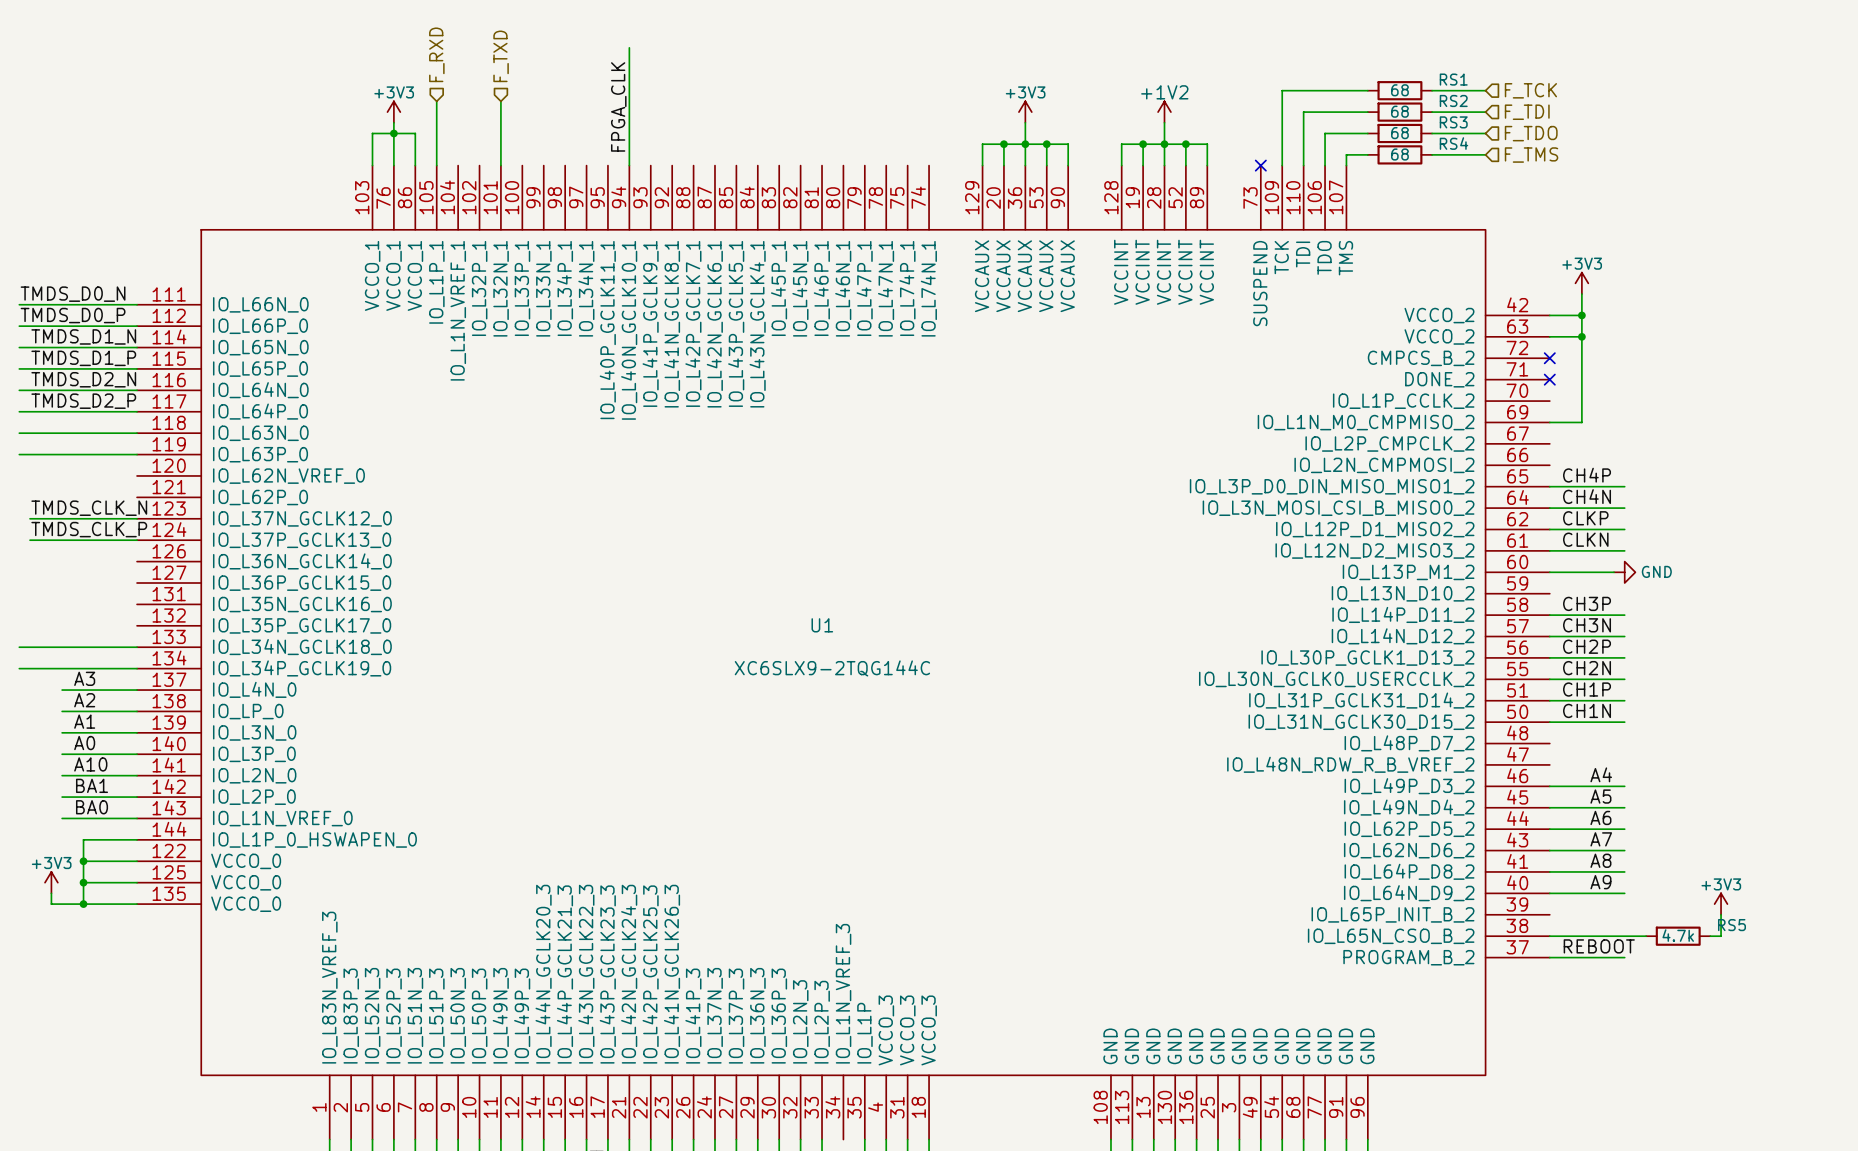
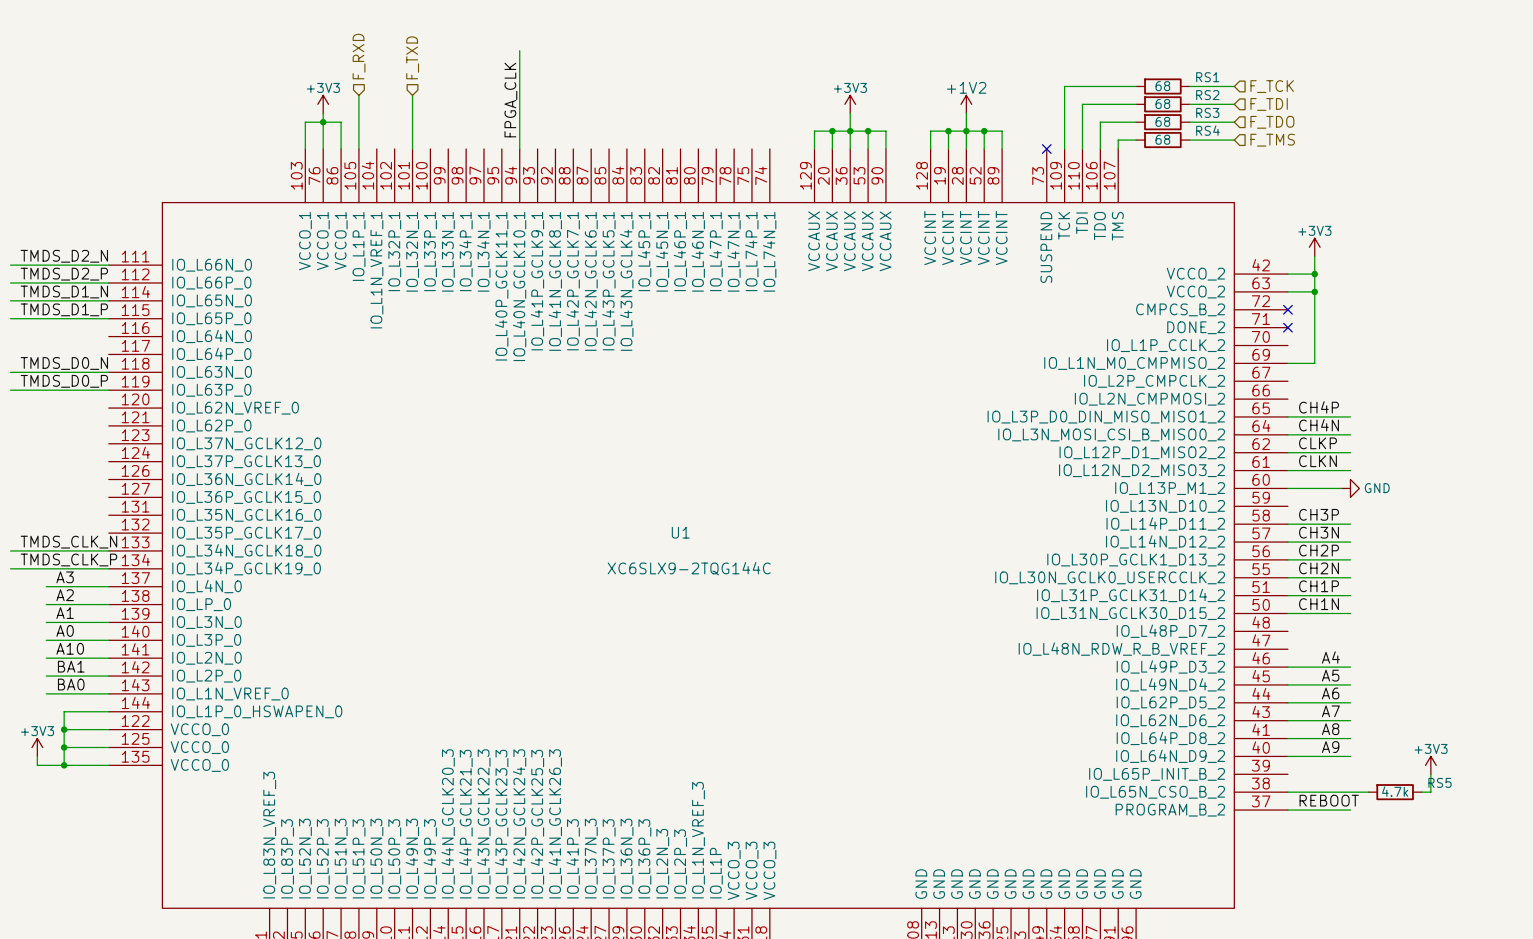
label position: TMDS_D0_N (73, 294) -> TMDS_D0_N (64, 363)
label position: TMDS_D0_P (73, 315) -> TMDS_D0_P (64, 381)
label position: TMDS_D2_N (83, 379) -> TMDS_D2_N (64, 256)
wire: (19, 390) (137, 390) -> none
label position: TMDS_D2_P (83, 401) -> TMDS_D2_P (64, 274)
wire: (19, 411) (137, 411) -> none
label position: TMDS_CLK_N (89, 508) -> TMDS_CLK_N (68, 542)
wire: (30, 518) (137, 518) -> none
label position: TMDS_CLK_P (89, 529) -> TMDS_CLK_P (68, 559)
wire: (30, 540) (137, 540) -> none

